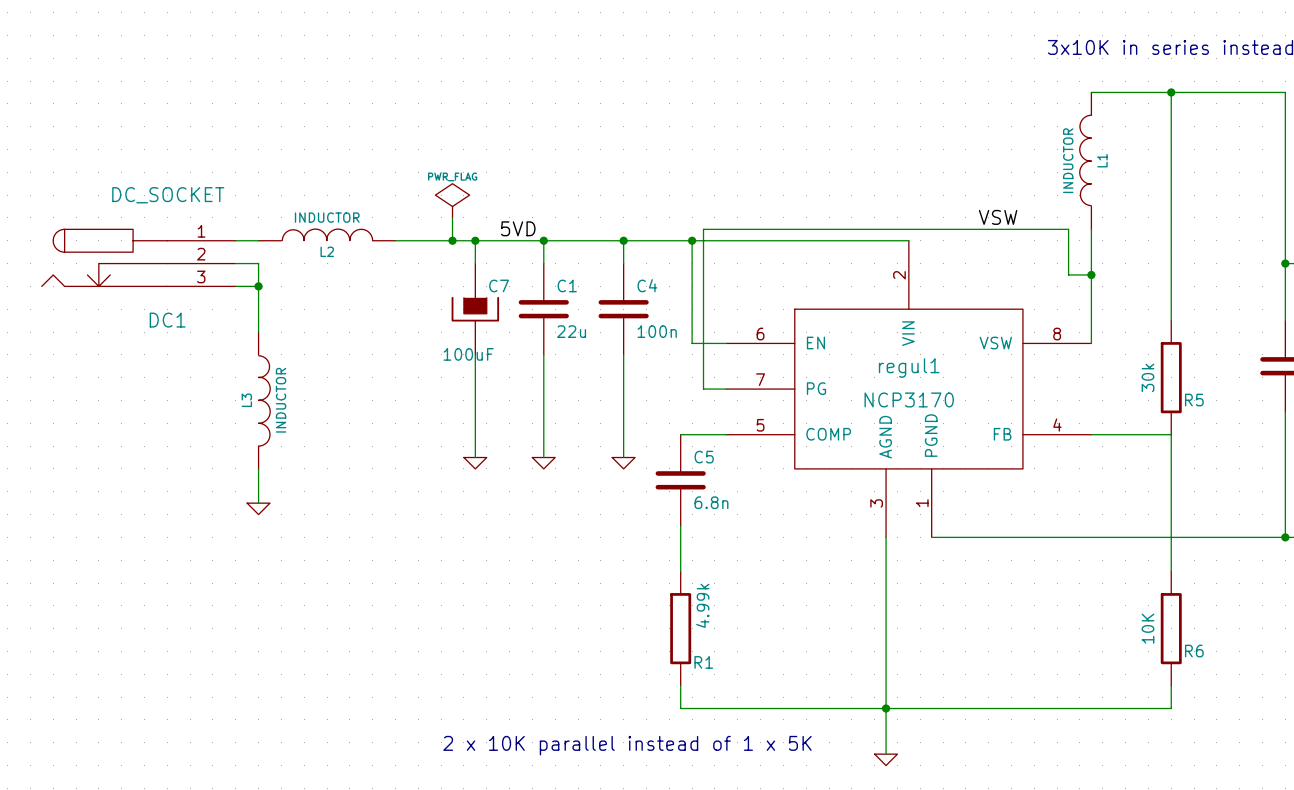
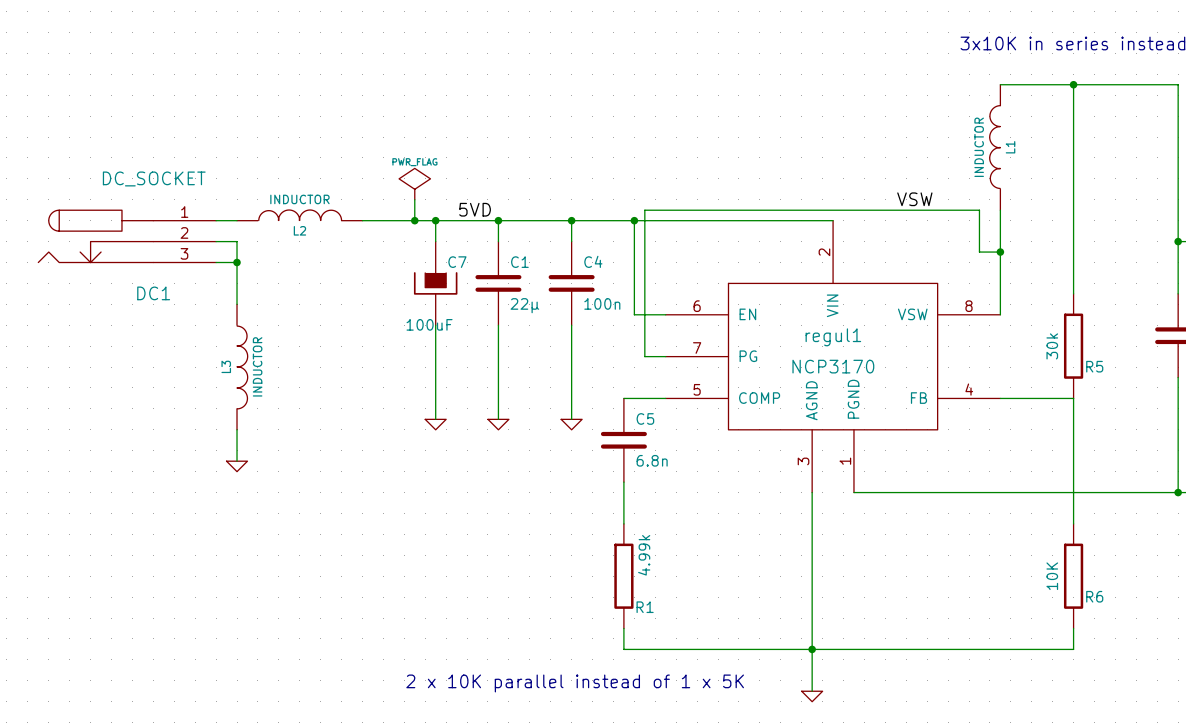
C1 value: 22u (571, 331) -> 22µ (524, 305)

